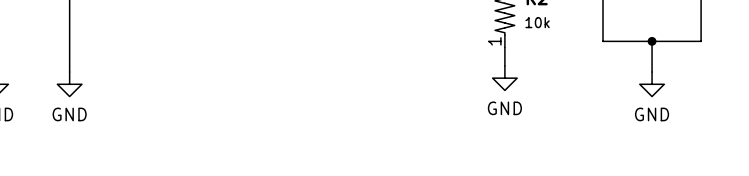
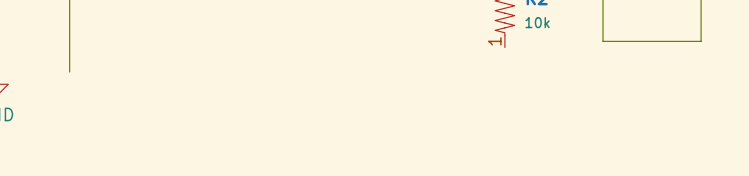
wire: (652, 41) (652, 72) -> none
junction: (652, 41) -> none
wire: (504, 47) (504, 65) -> none
power symbol: GND (504, 78) -> none
power symbol: GND (69, 84) -> none
power symbol: GND (652, 84) -> none

